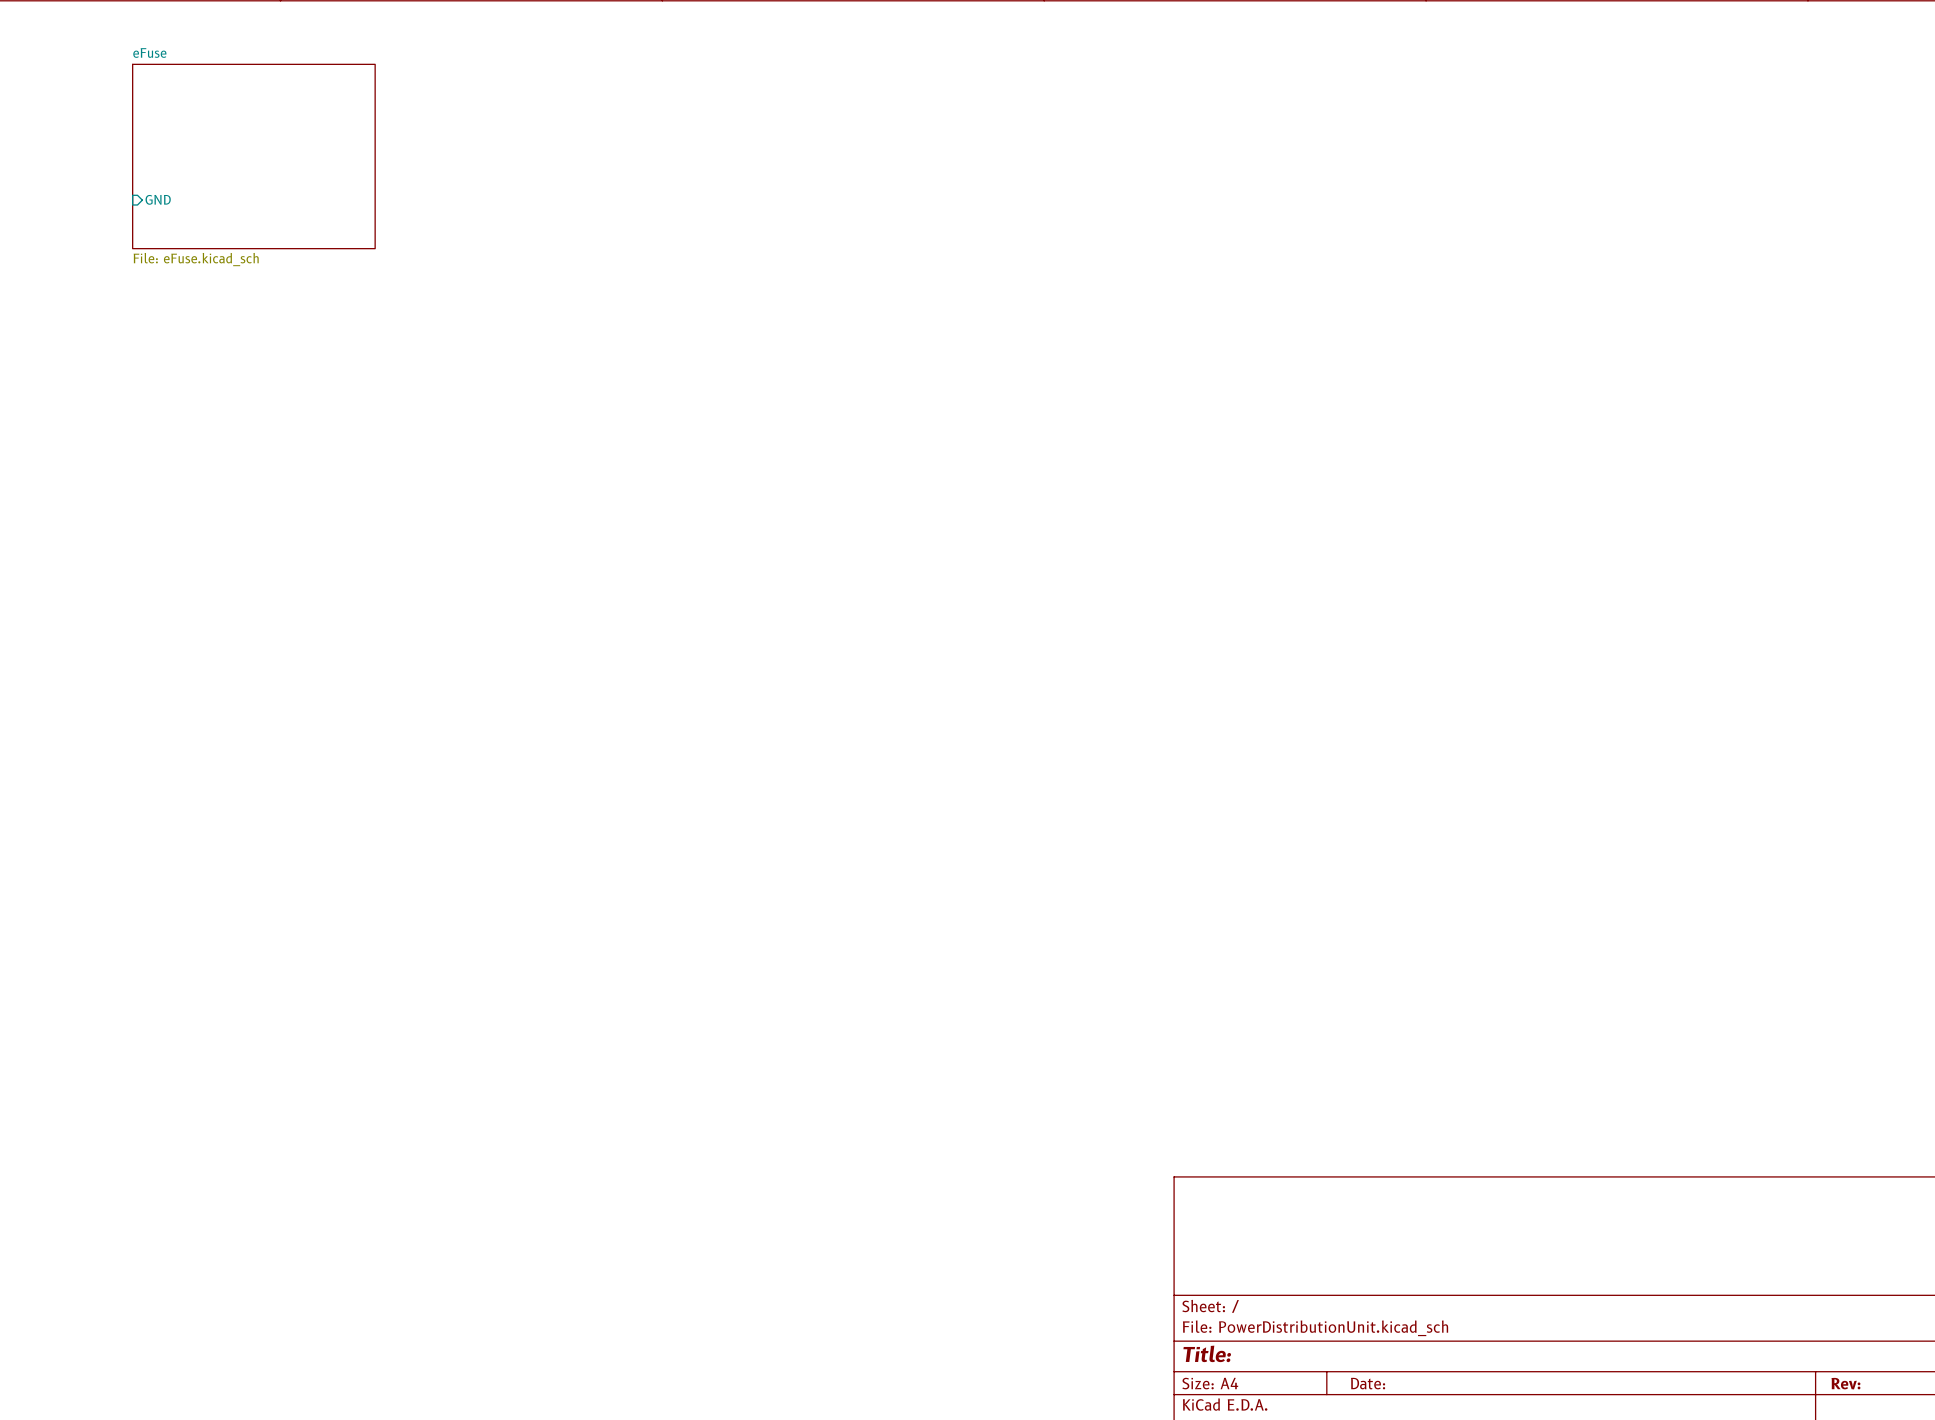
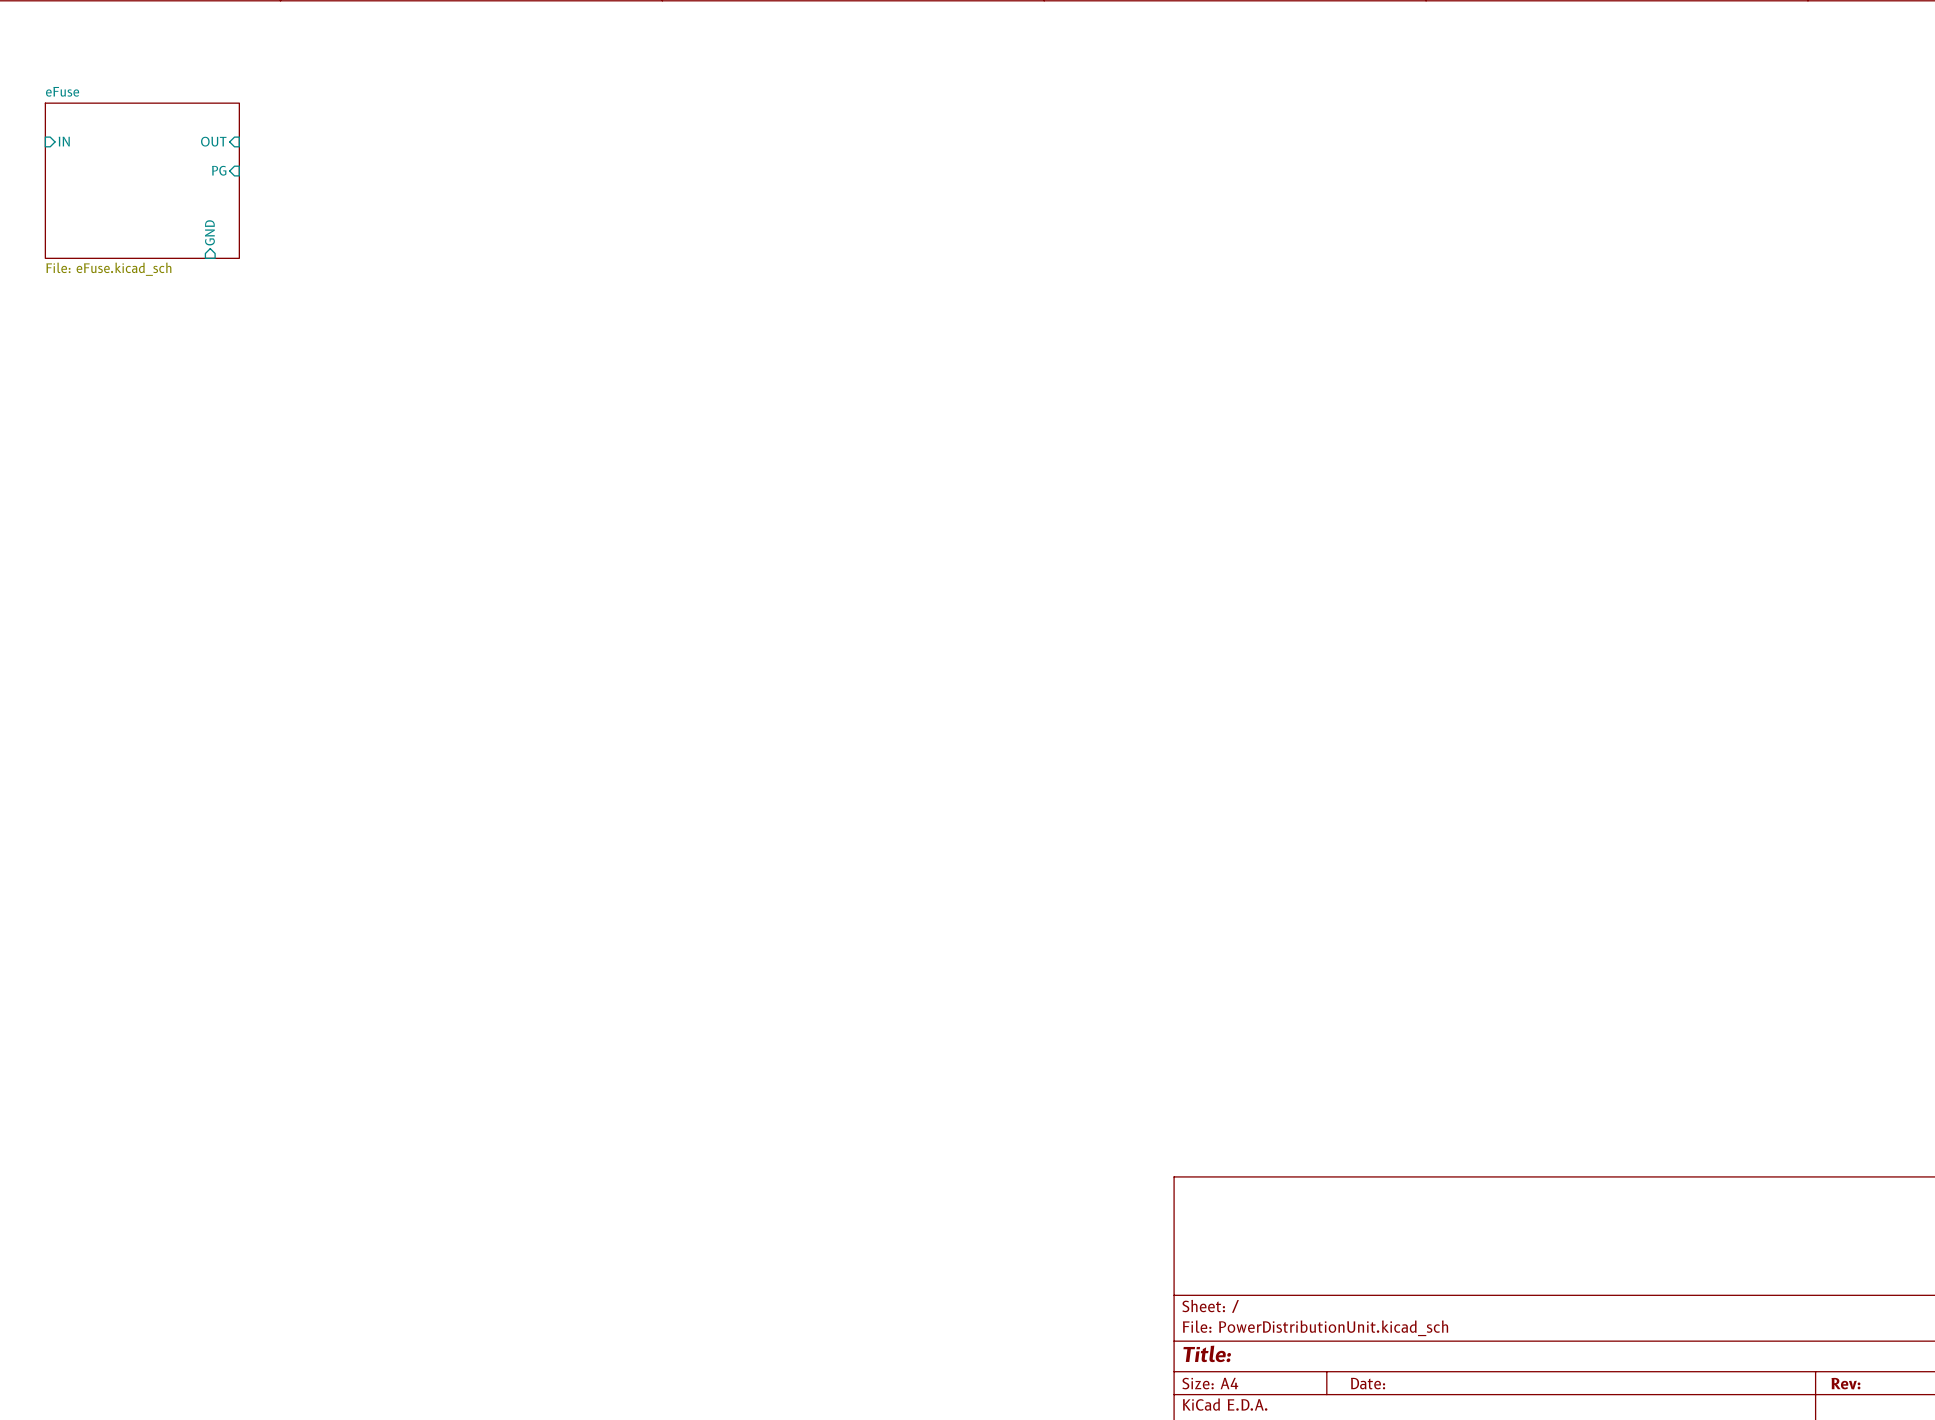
sheet pin: none -> IN (64, 141)
sheet pin: none -> OUT (213, 141)
sheet eFuse: File: eFuse.kicad_sch (253, 156) -> none
sheet pin: none -> PG (219, 170)
sheet eFuse: none -> File: eFuse.kicad_sch (142, 180)
sheet pin rotation: 0° (158, 199) -> 90° counterclockwise (209, 232)
sheet pin position: GND (158, 199) -> GND (209, 232)

